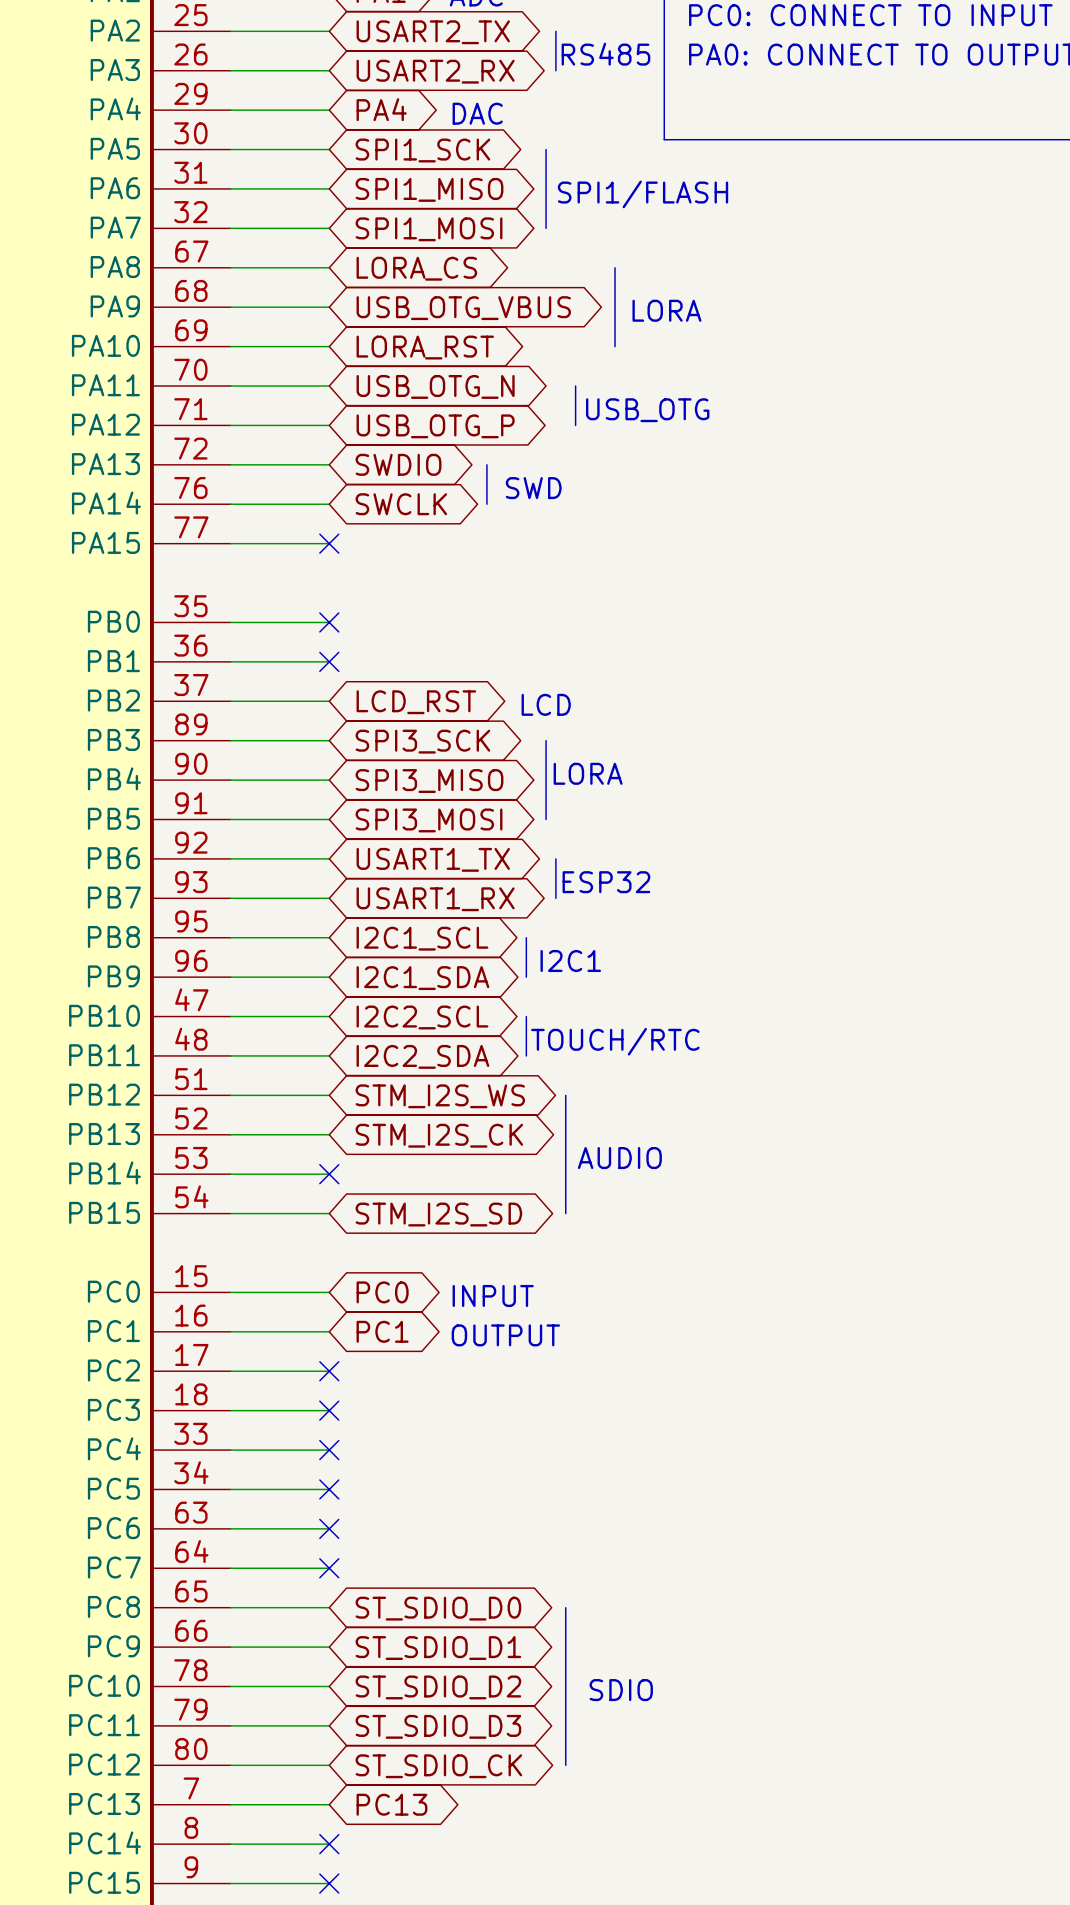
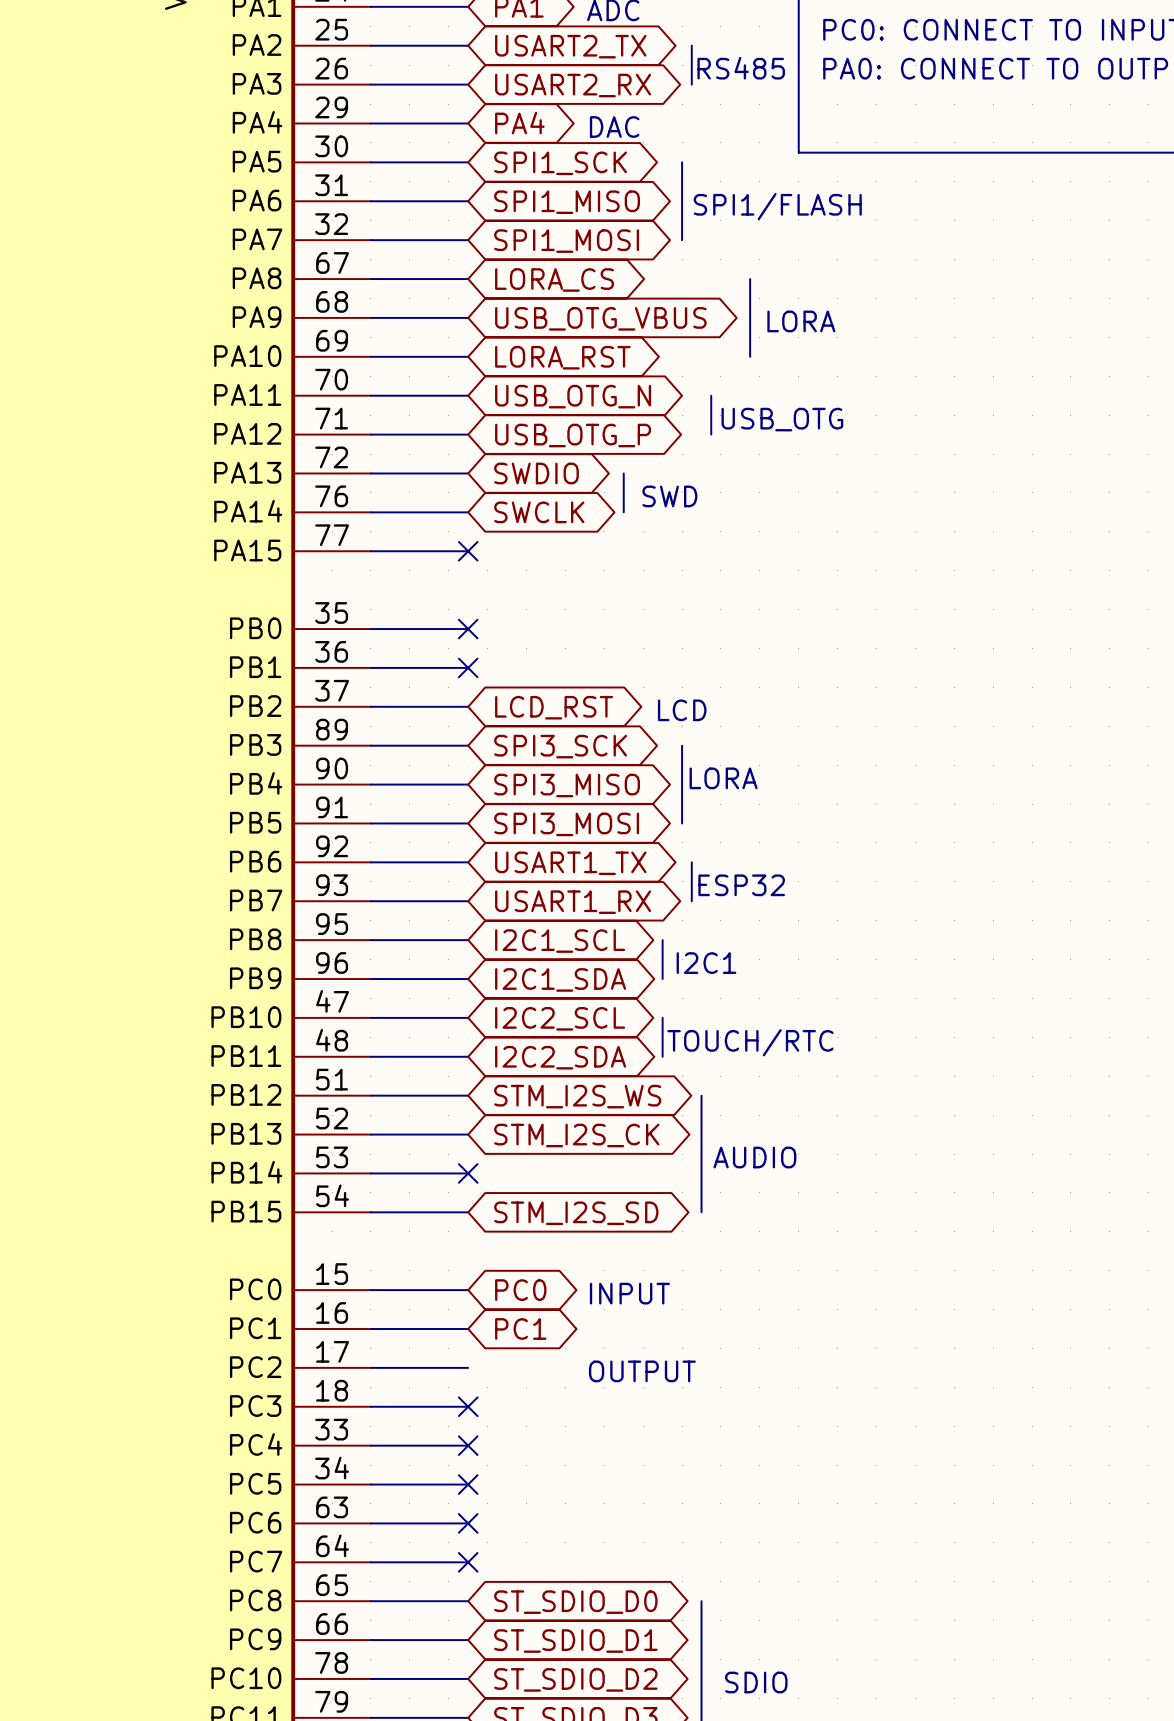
text position: OUTPUT (505, 1335) -> OUTPUT (642, 1371)
no-connect mark: (329, 1371) -> none

